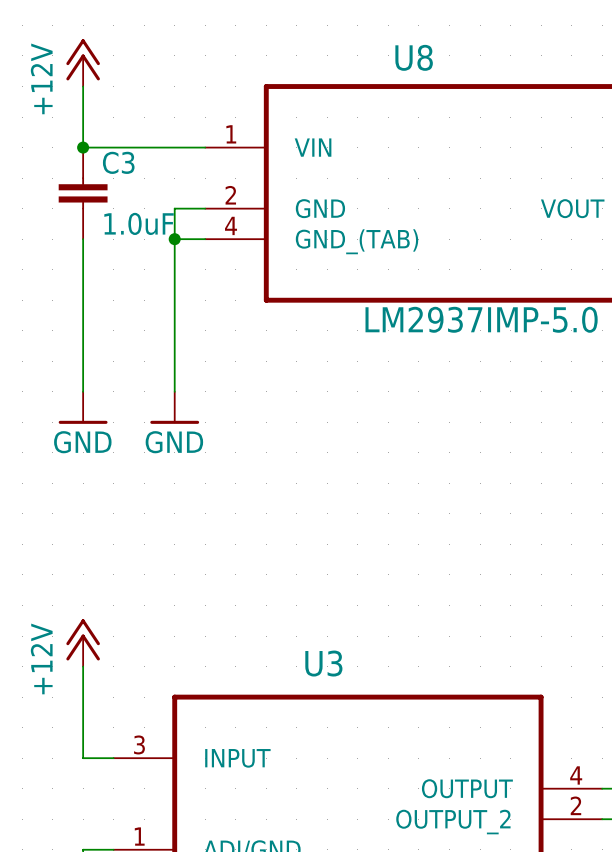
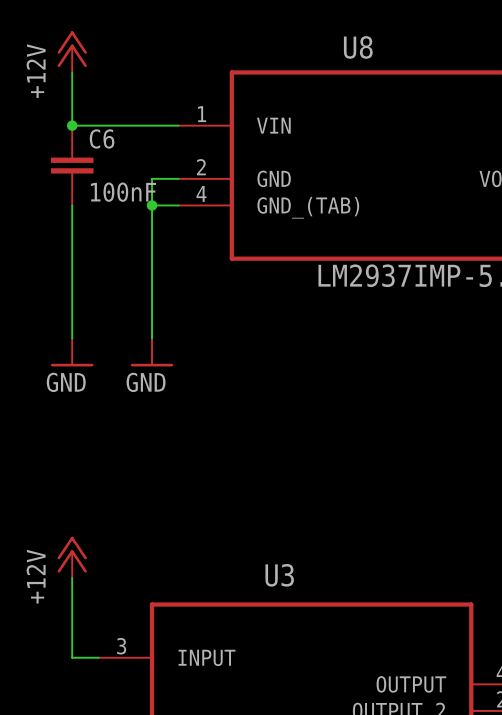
C3 name: C3 (118, 162) -> C6 (102, 138)
C3 value: 1.0uF (139, 223) -> 100nF (123, 192)

